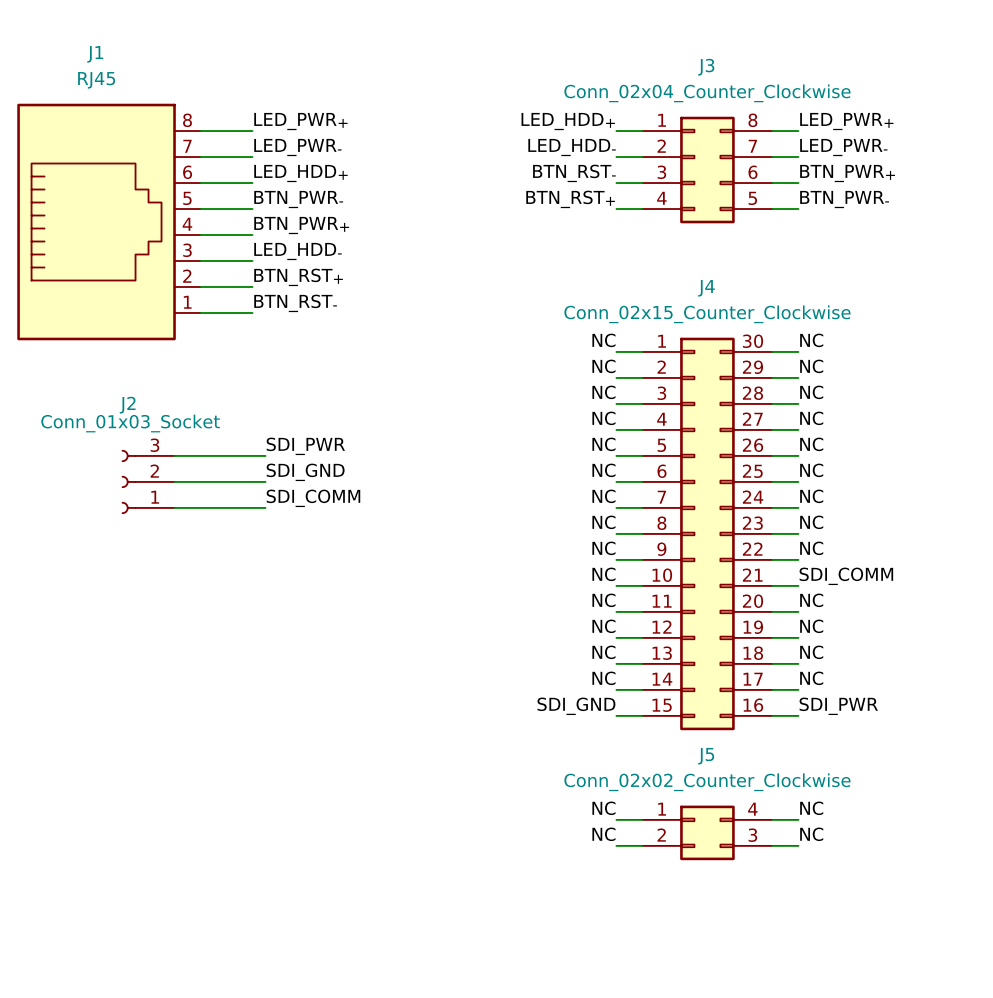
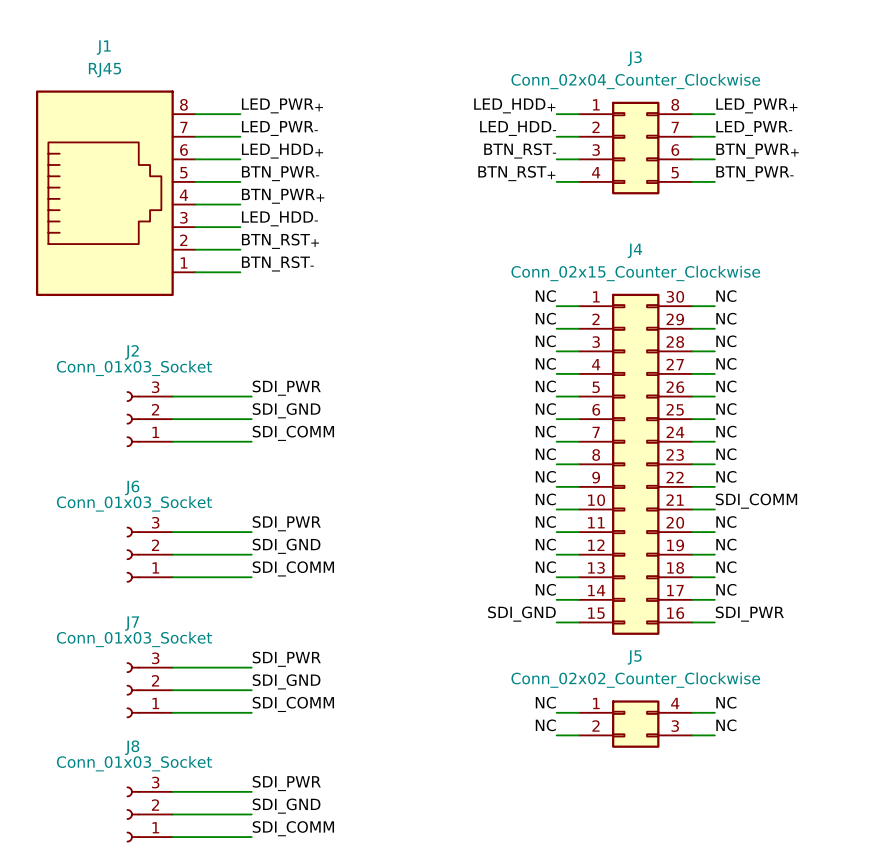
label: none -> SDI_PWR (286, 523)
wire: none -> (172, 532) (251, 532)
label: none -> SDI_GND (286, 546)
J6: none -> Conn_01x03_Socket (149, 554)
wire: none -> (172, 554) (251, 554)
label: none -> SDI_COMM (293, 568)
wire: none -> (172, 577) (251, 577)
label: none -> SDI_PWR (286, 659)
wire: none -> (172, 667) (251, 667)
label: none -> SDI_GND (286, 681)
J7: none -> Conn_01x03_Socket (149, 690)
wire: none -> (172, 690) (251, 690)
label: none -> SDI_COMM (293, 704)
wire: none -> (172, 712) (251, 712)
label: none -> SDI_PWR (286, 783)
wire: none -> (172, 791) (251, 791)
label: none -> SDI_GND (286, 806)
J8: none -> Conn_01x03_Socket (149, 814)
wire: none -> (172, 814) (251, 814)
label: none -> SDI_COMM (293, 828)
wire: none -> (172, 837) (251, 837)

